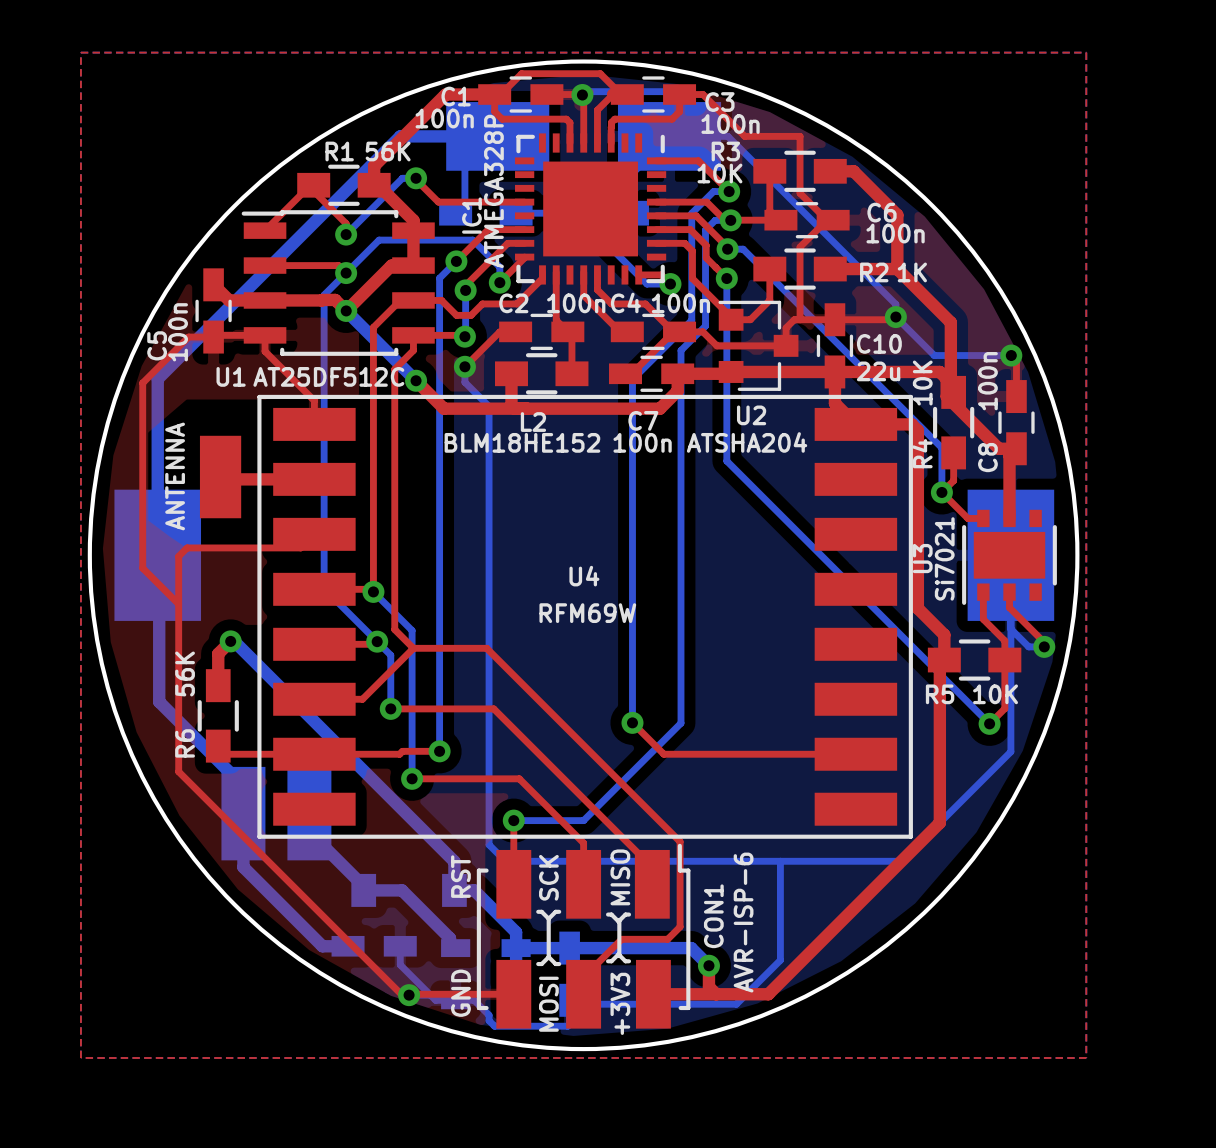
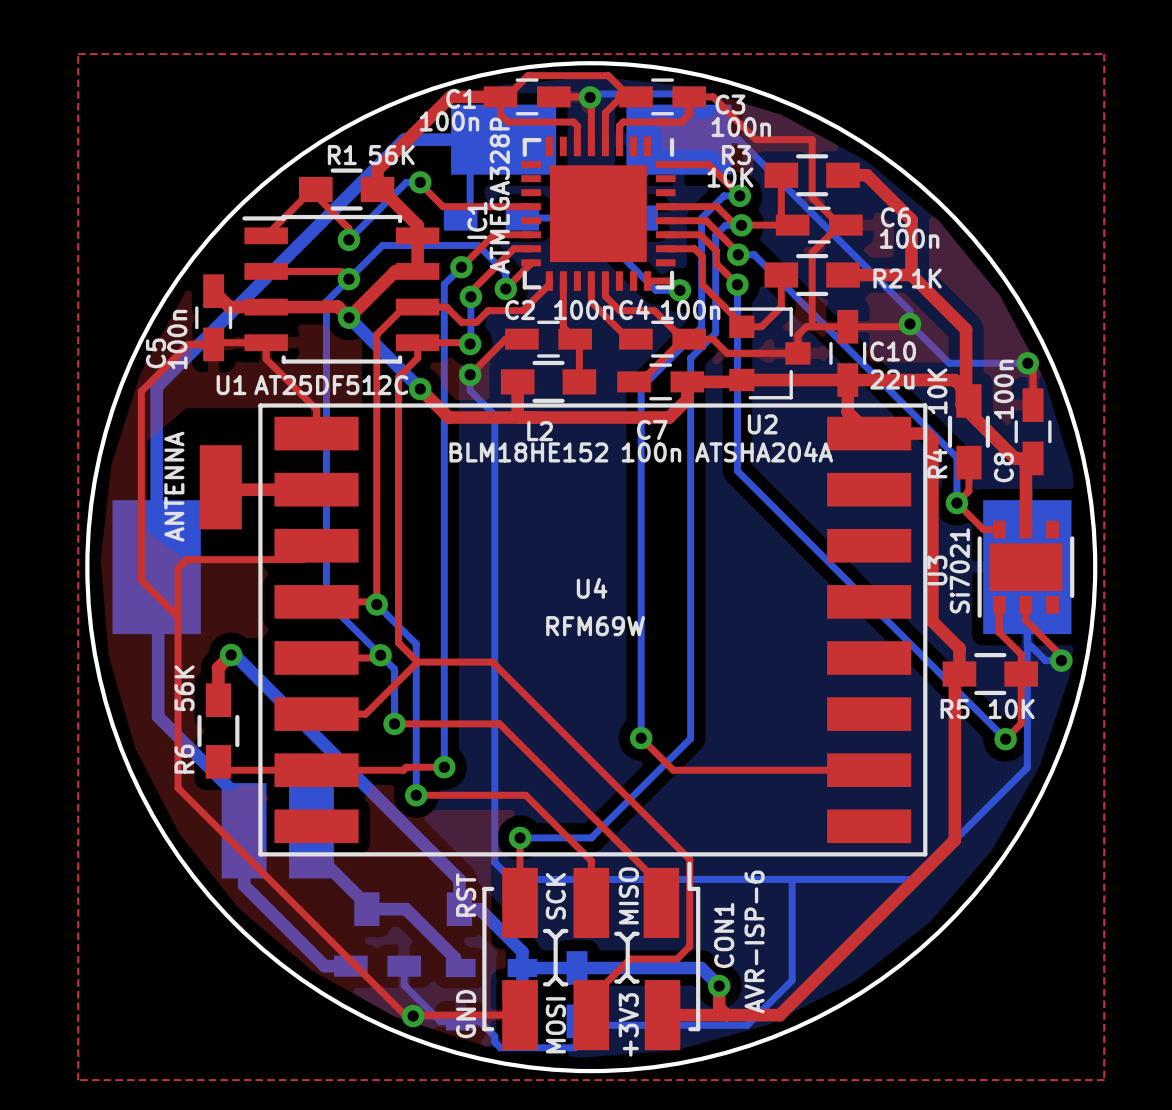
U2 value: ATSHA204 (747, 442) -> ATSHA204A (764, 452)

